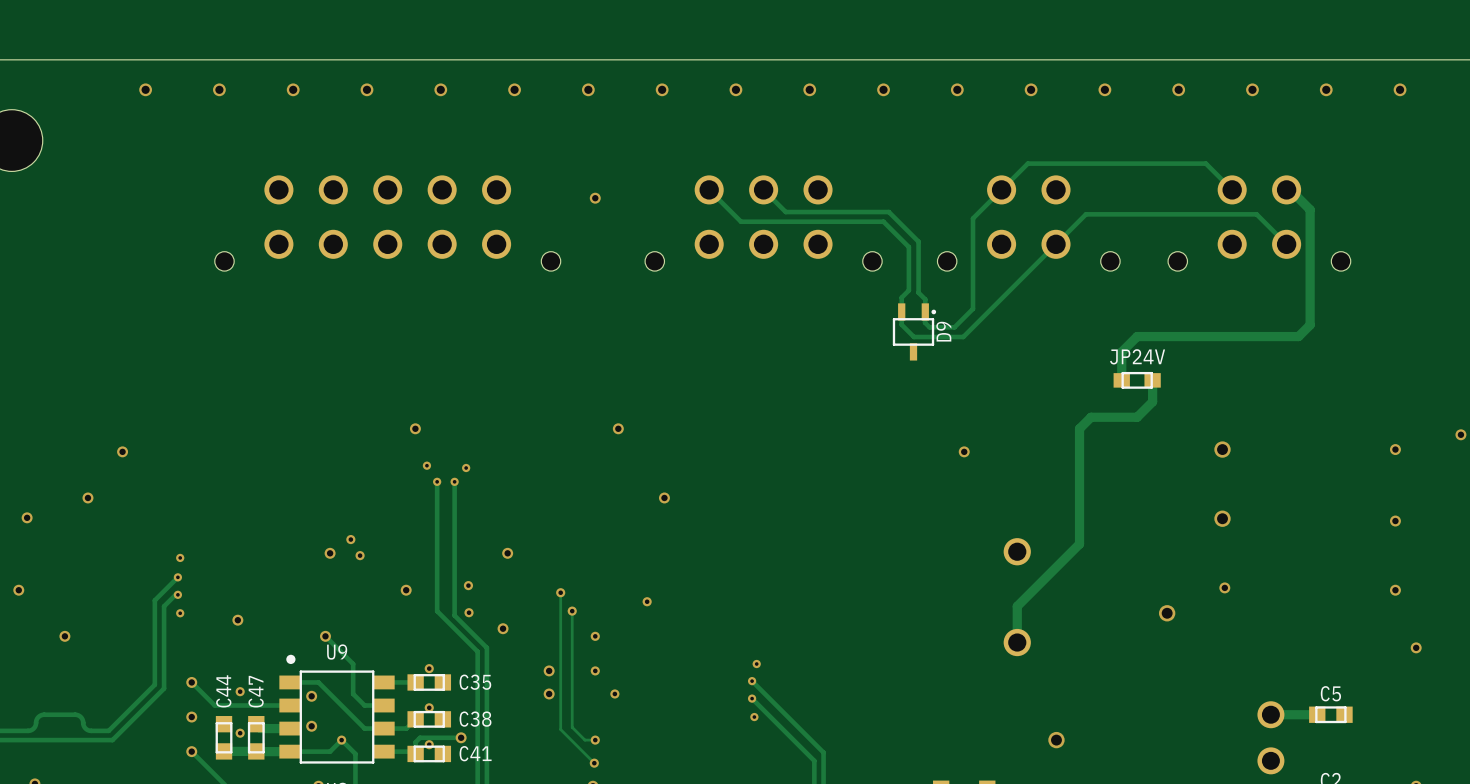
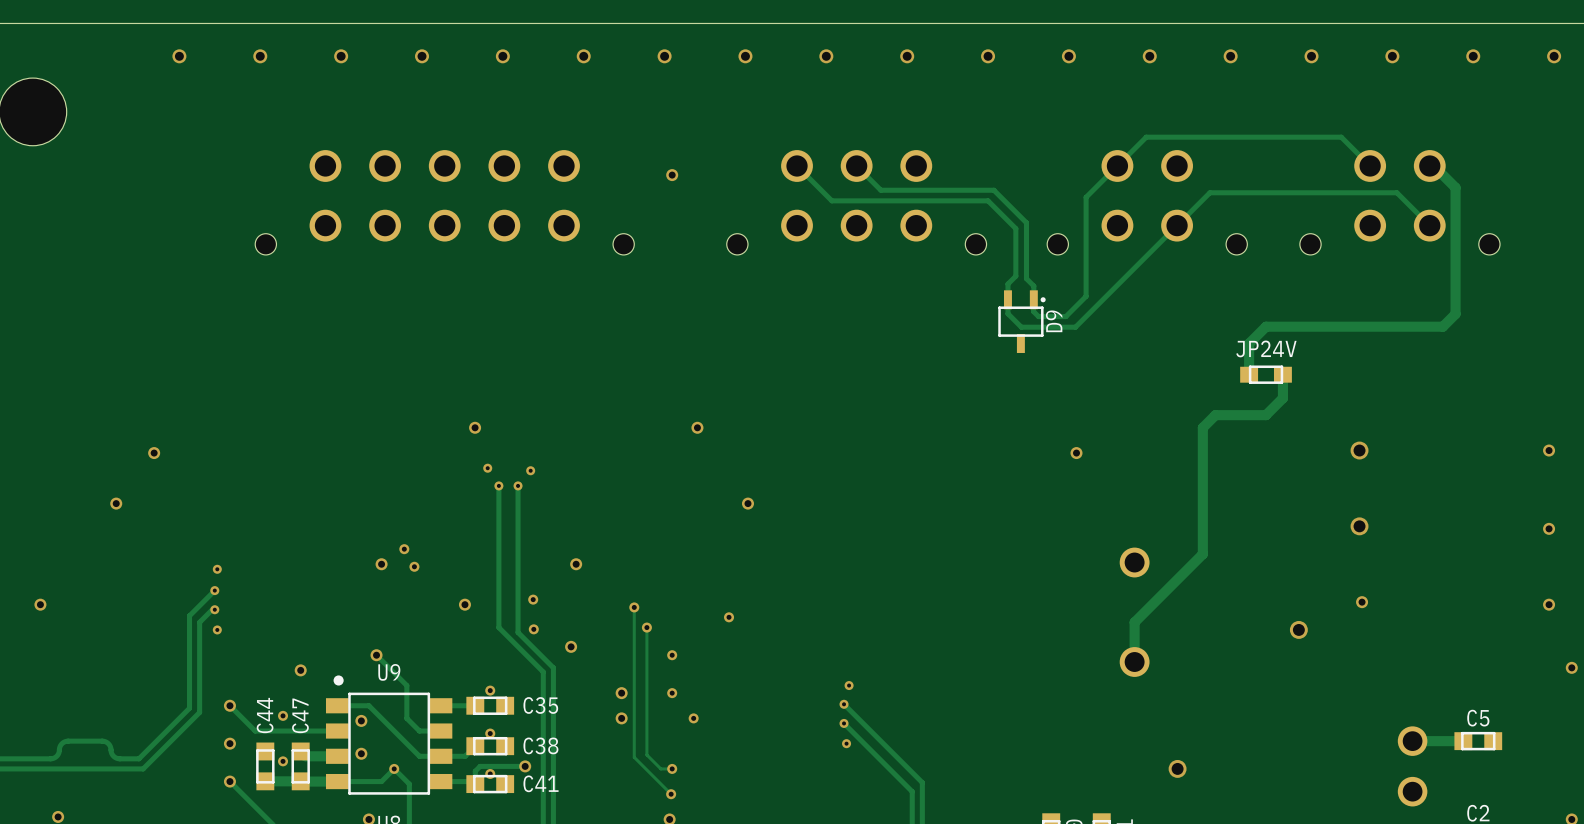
via: (27, 517) -> none
via position: (237, 620) -> (300, 670)
via: (64, 636) -> none

